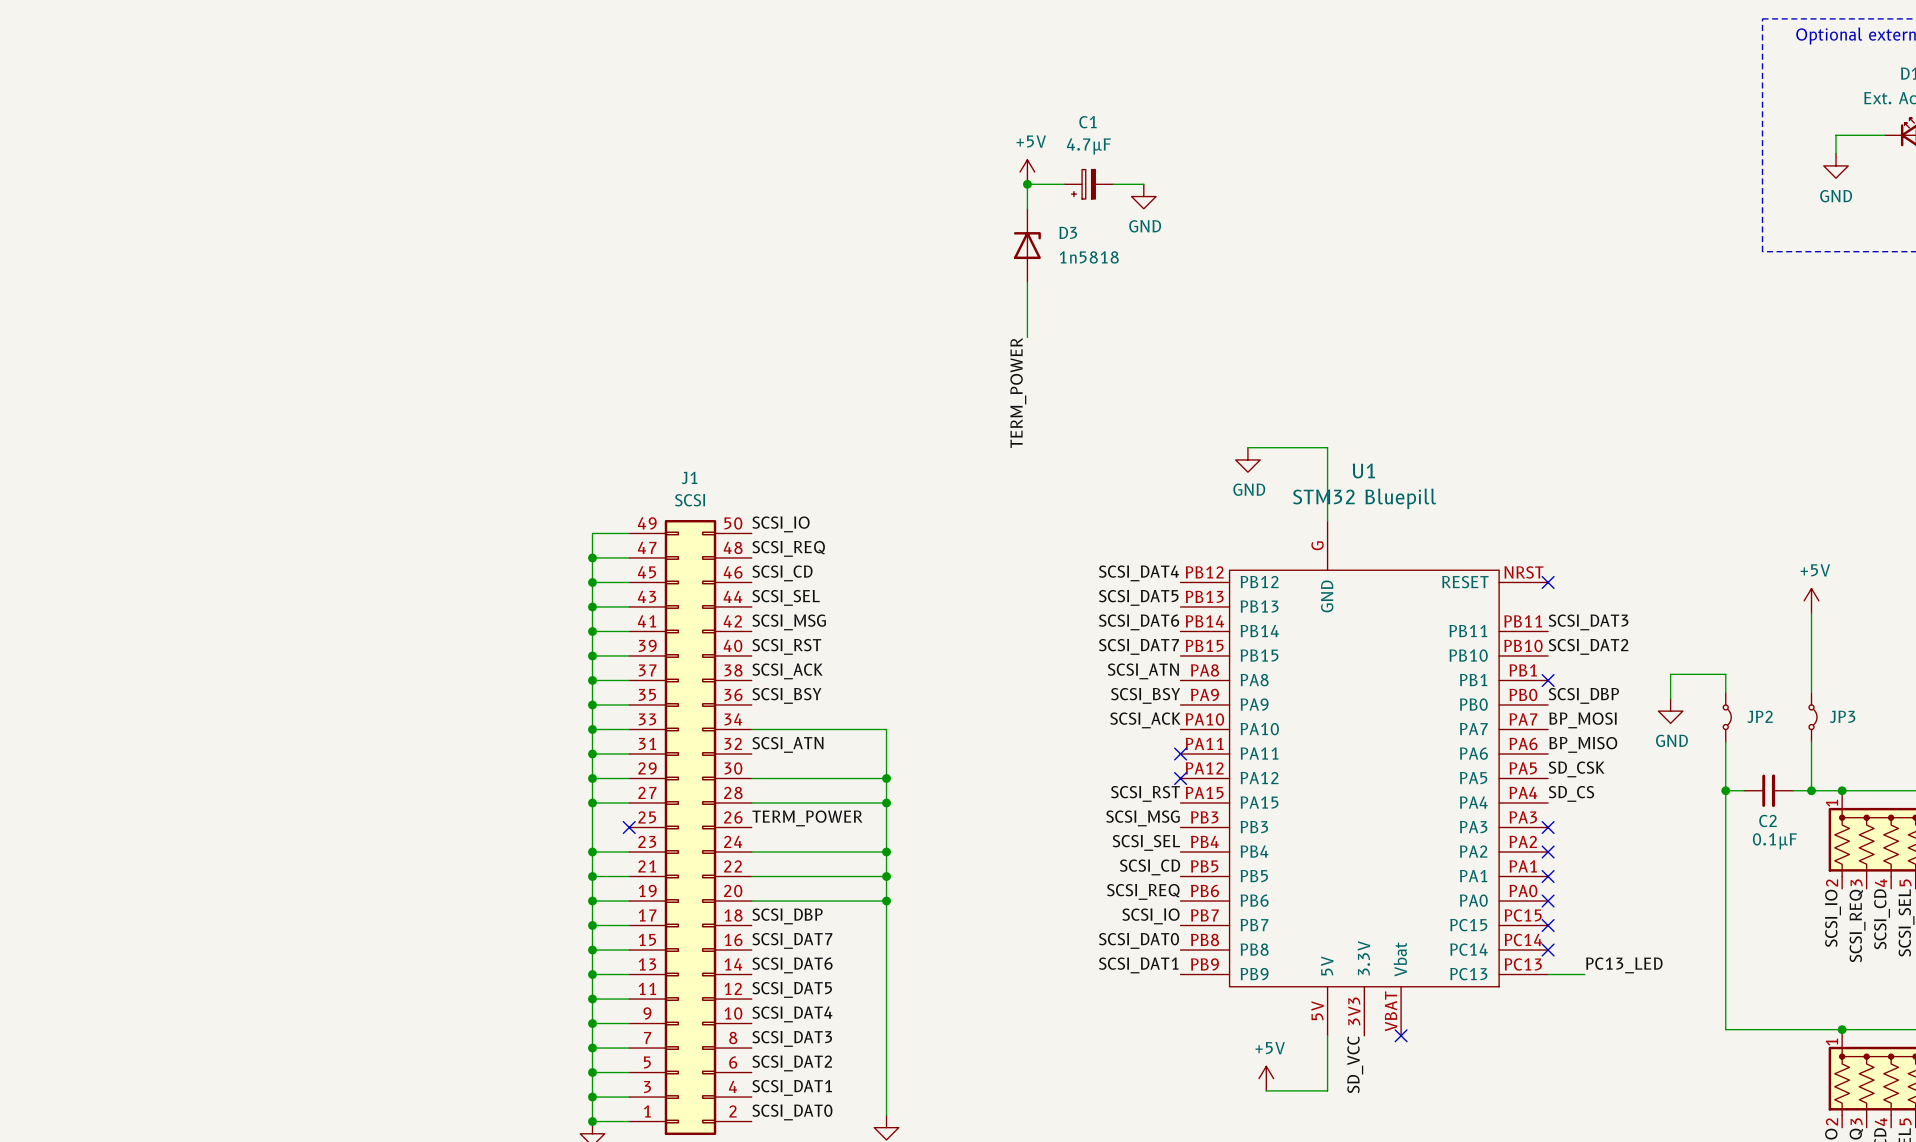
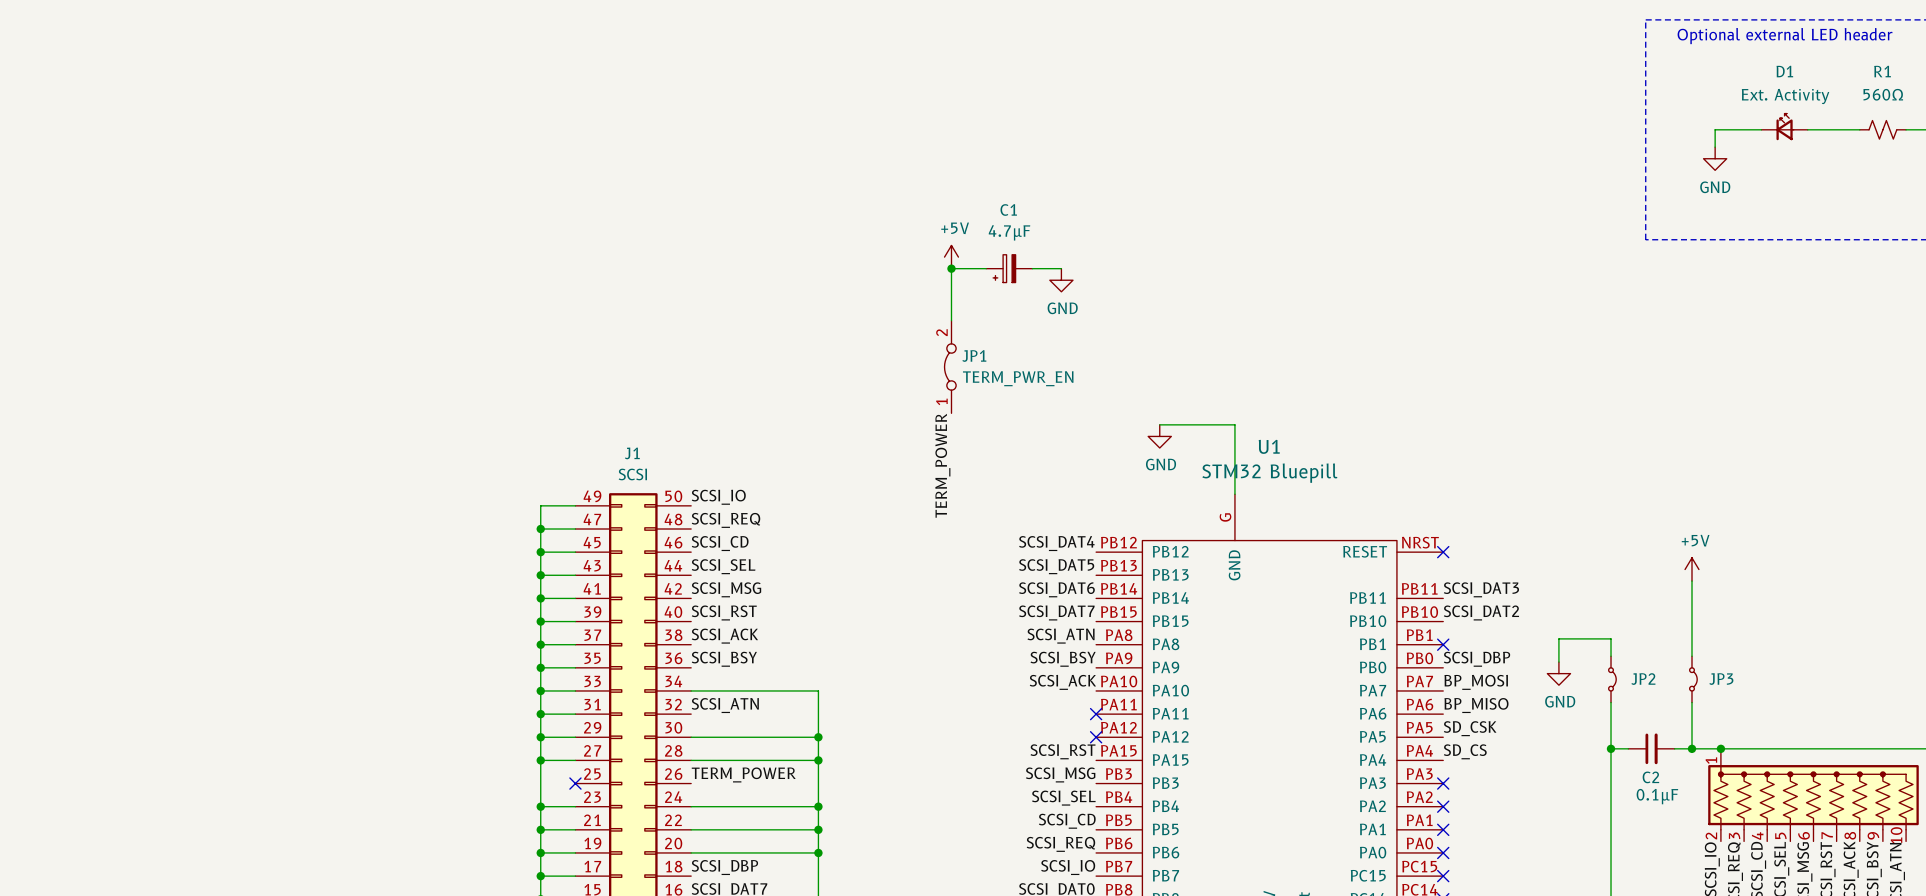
power symbol position: +5V (1027, 172) -> +5V (951, 257)
junction: (1027, 184) -> none
wire: (1064, 184) (1027, 184) (1027, 208) -> none
C1 position: (1088, 184) -> (1009, 268)
wire: (1113, 184) (1143, 184) -> (1032, 268) (1061, 268)
power symbol position: GND (1143, 196) -> GND (1061, 280)
D3: 1n5818 (1027, 245) -> none
wire: none -> (951, 268) (986, 268)
junction: none -> (951, 268)
JP1: none -> TERM_PWR_EN (950, 367)
label position: TERM_POWER (1018, 393) -> TERM_POWER (942, 465)

